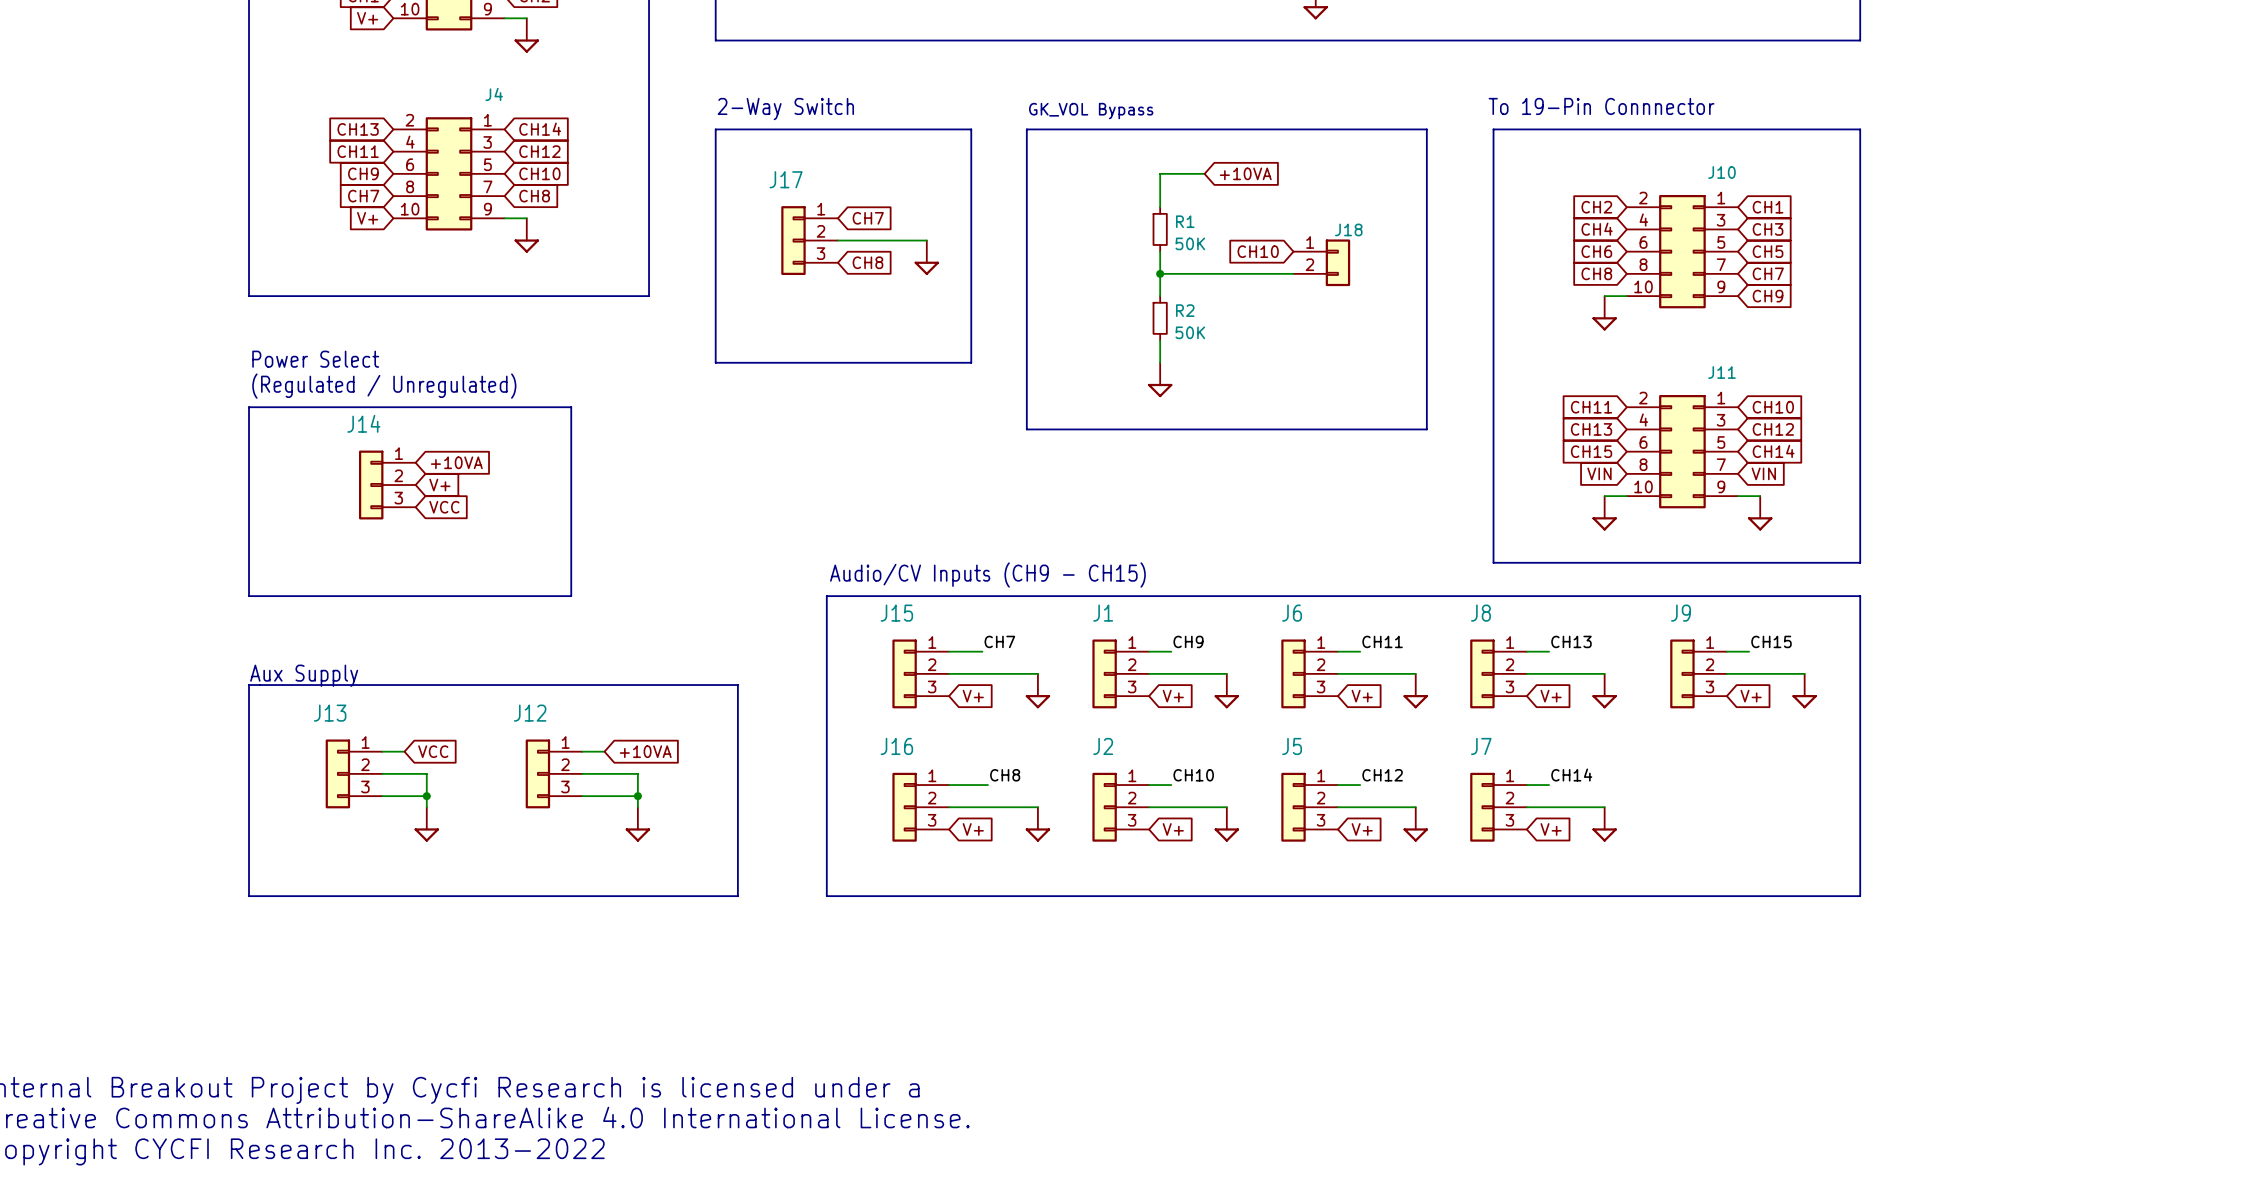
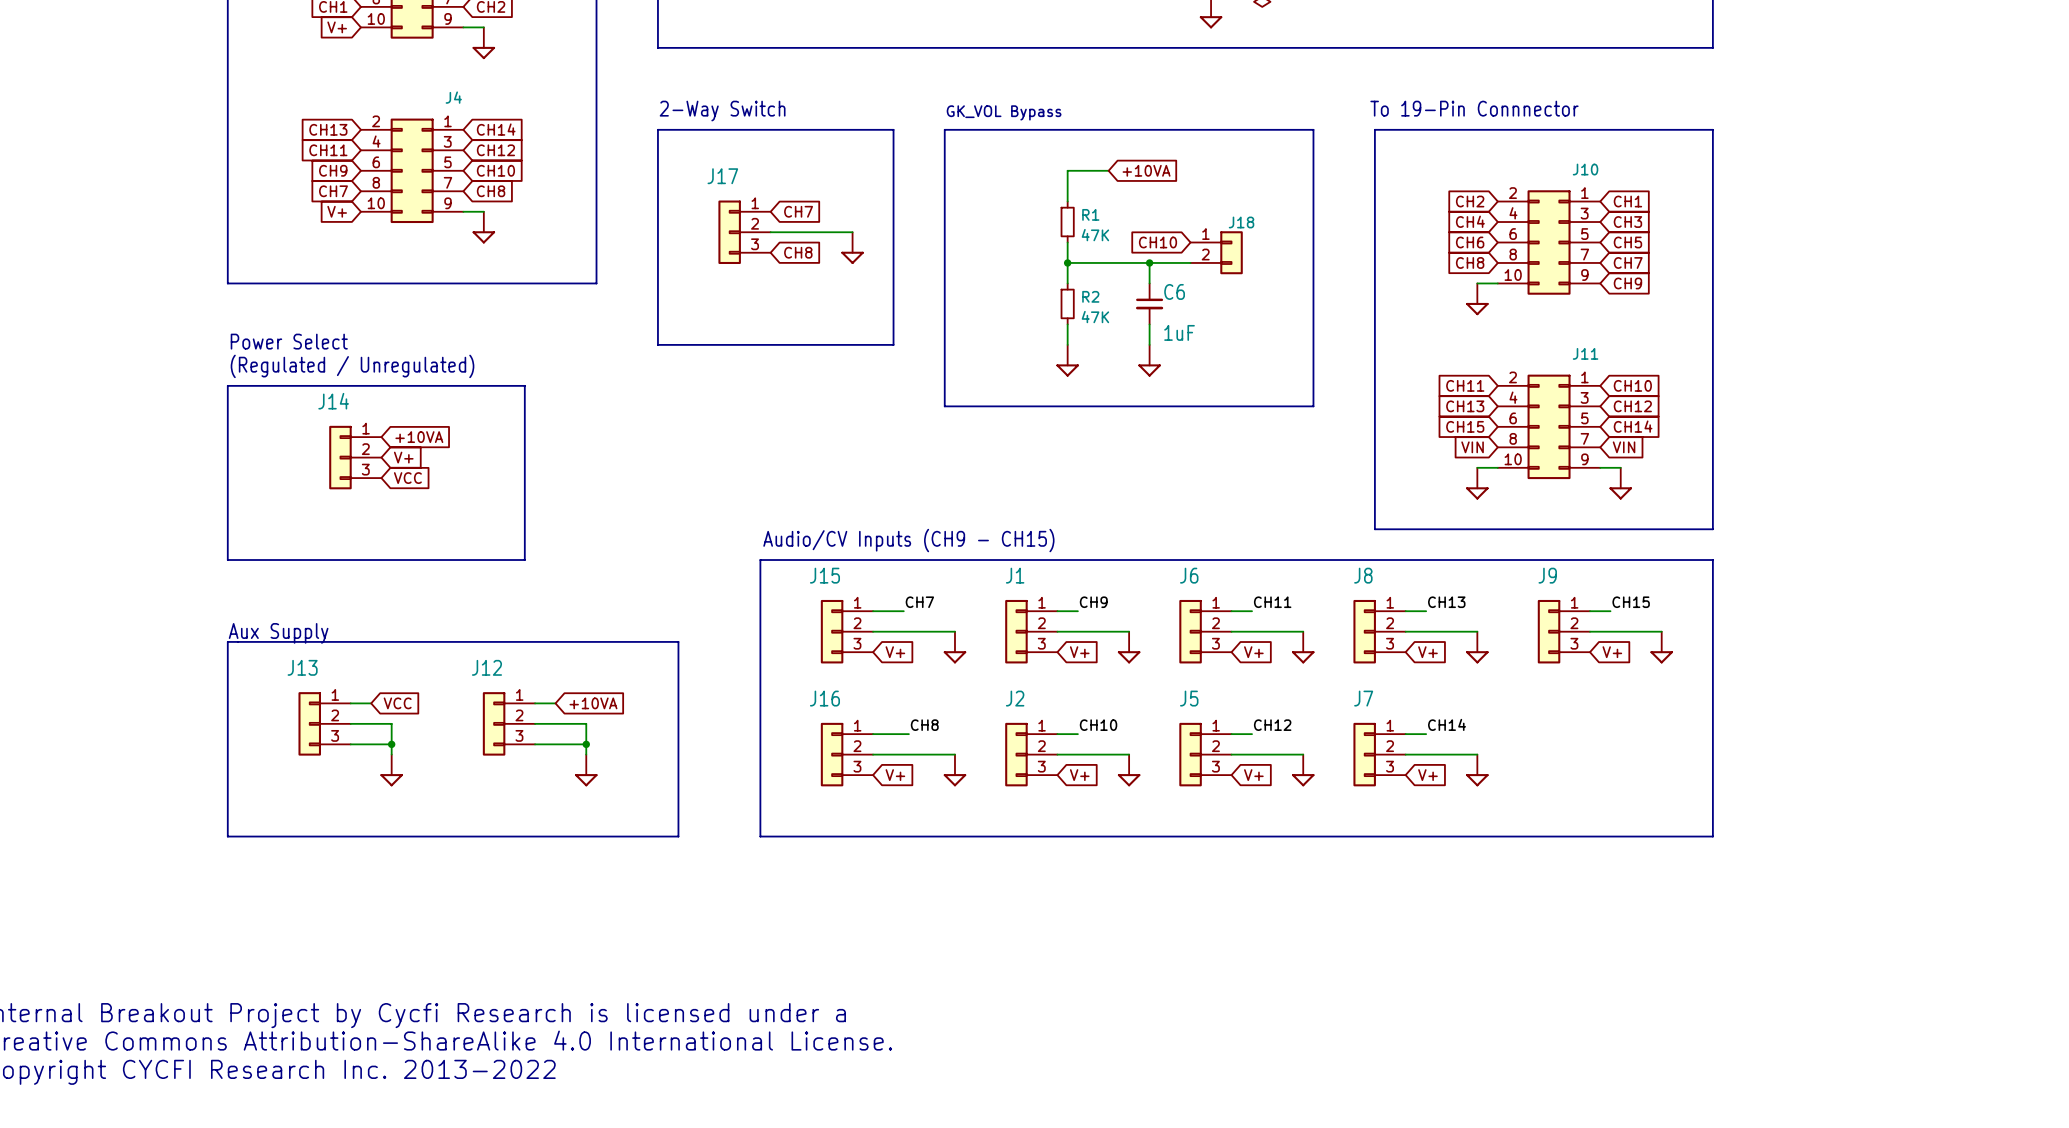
R1 value: 50K (1190, 243) -> 47K (1095, 235)
wire: none -> (1149, 262) (1149, 283)
junction: none -> (1149, 262)
C6: none -> 1uF (1149, 303)
R2 value: 50K (1190, 332) -> 47K (1095, 317)
wire: none -> (1149, 324) (1149, 344)
power symbol: none -> (1149, 360)

